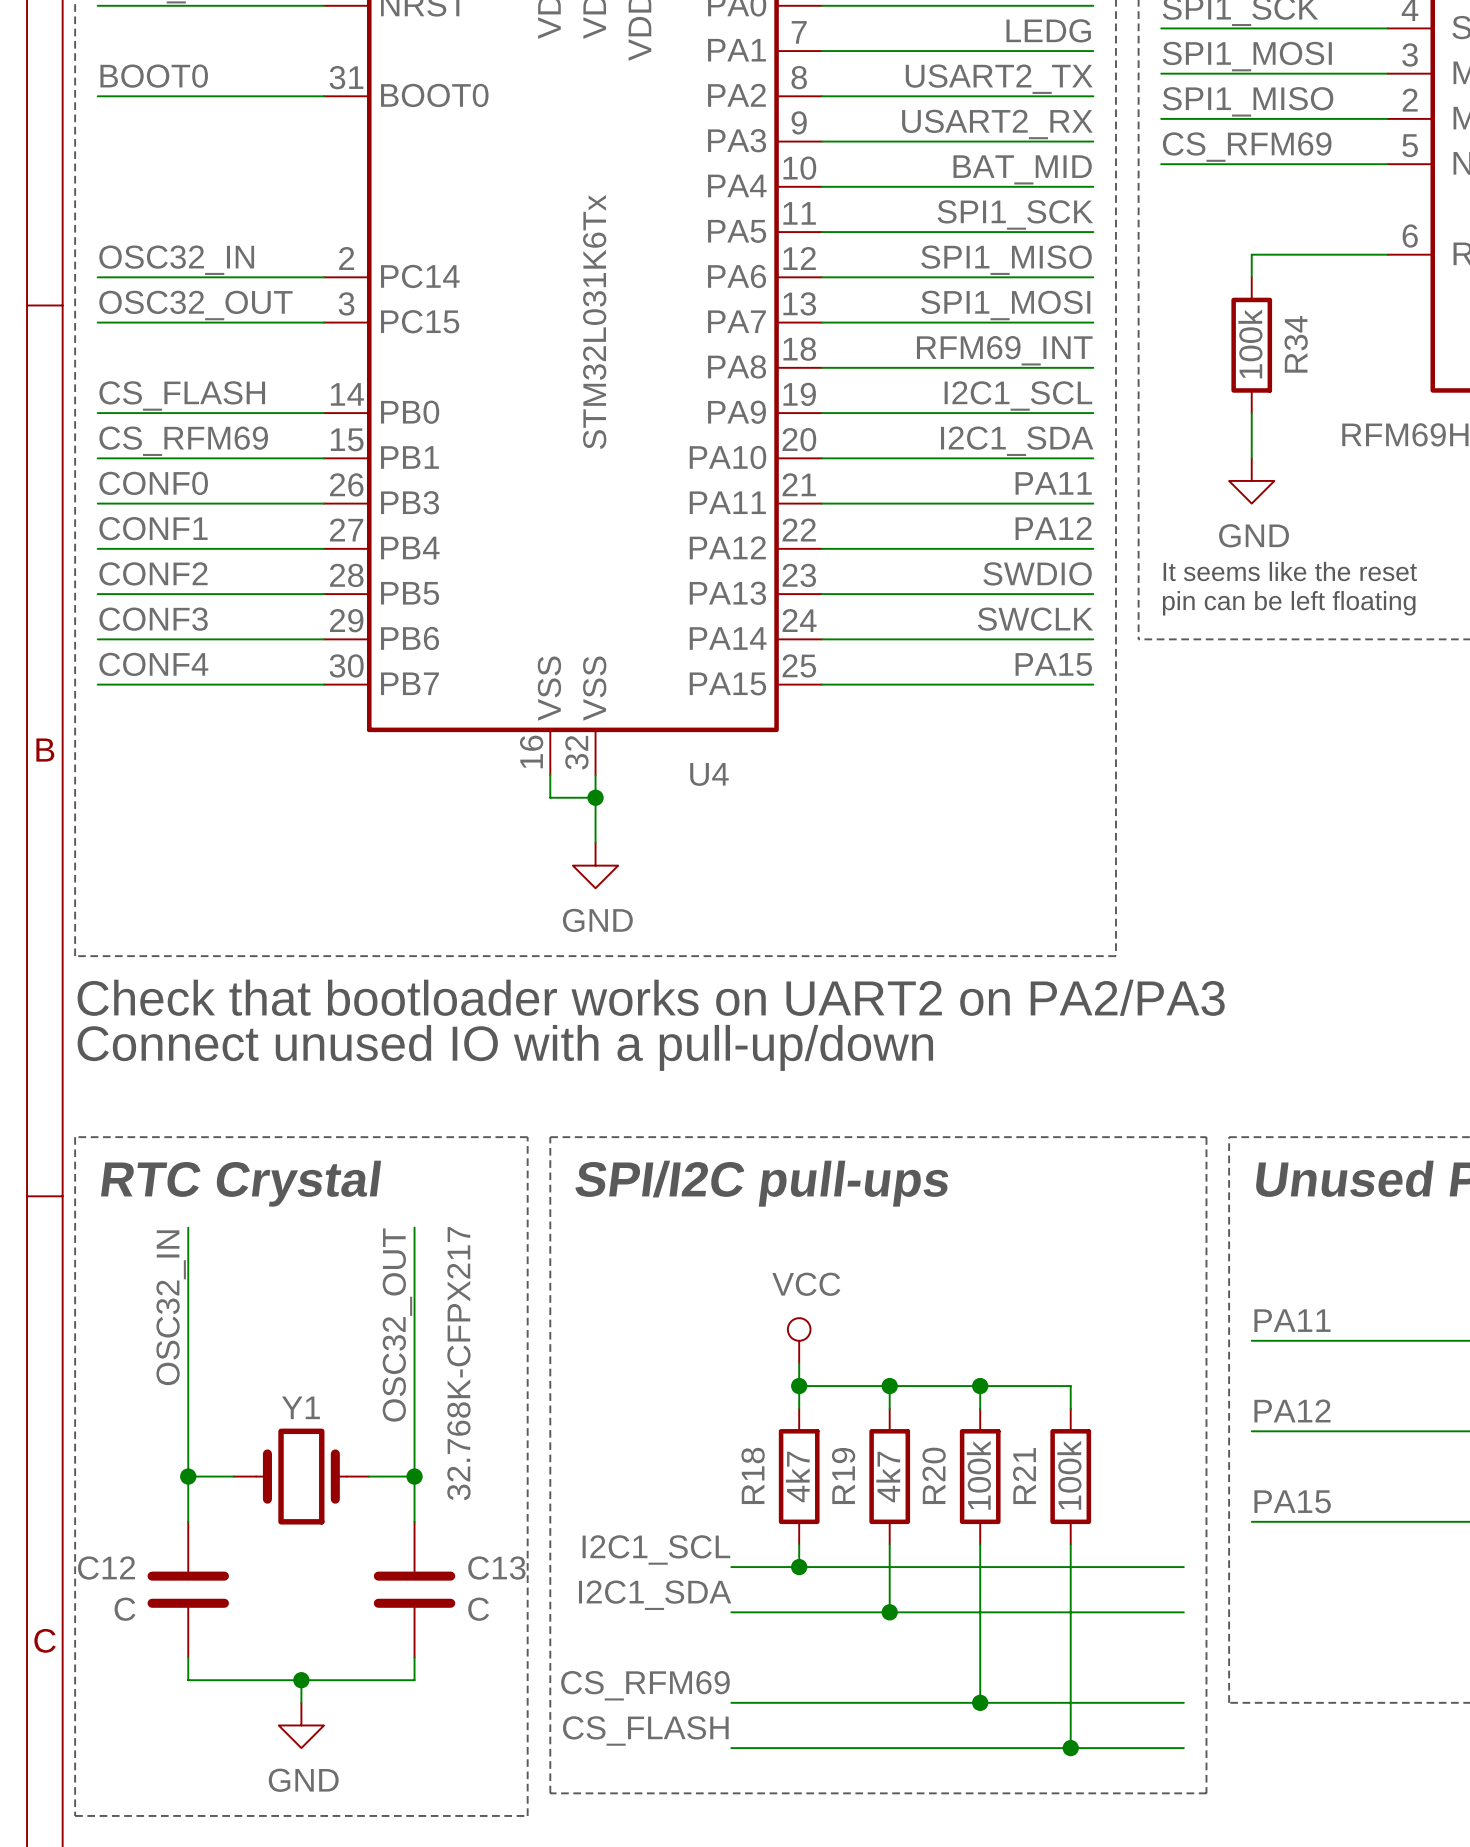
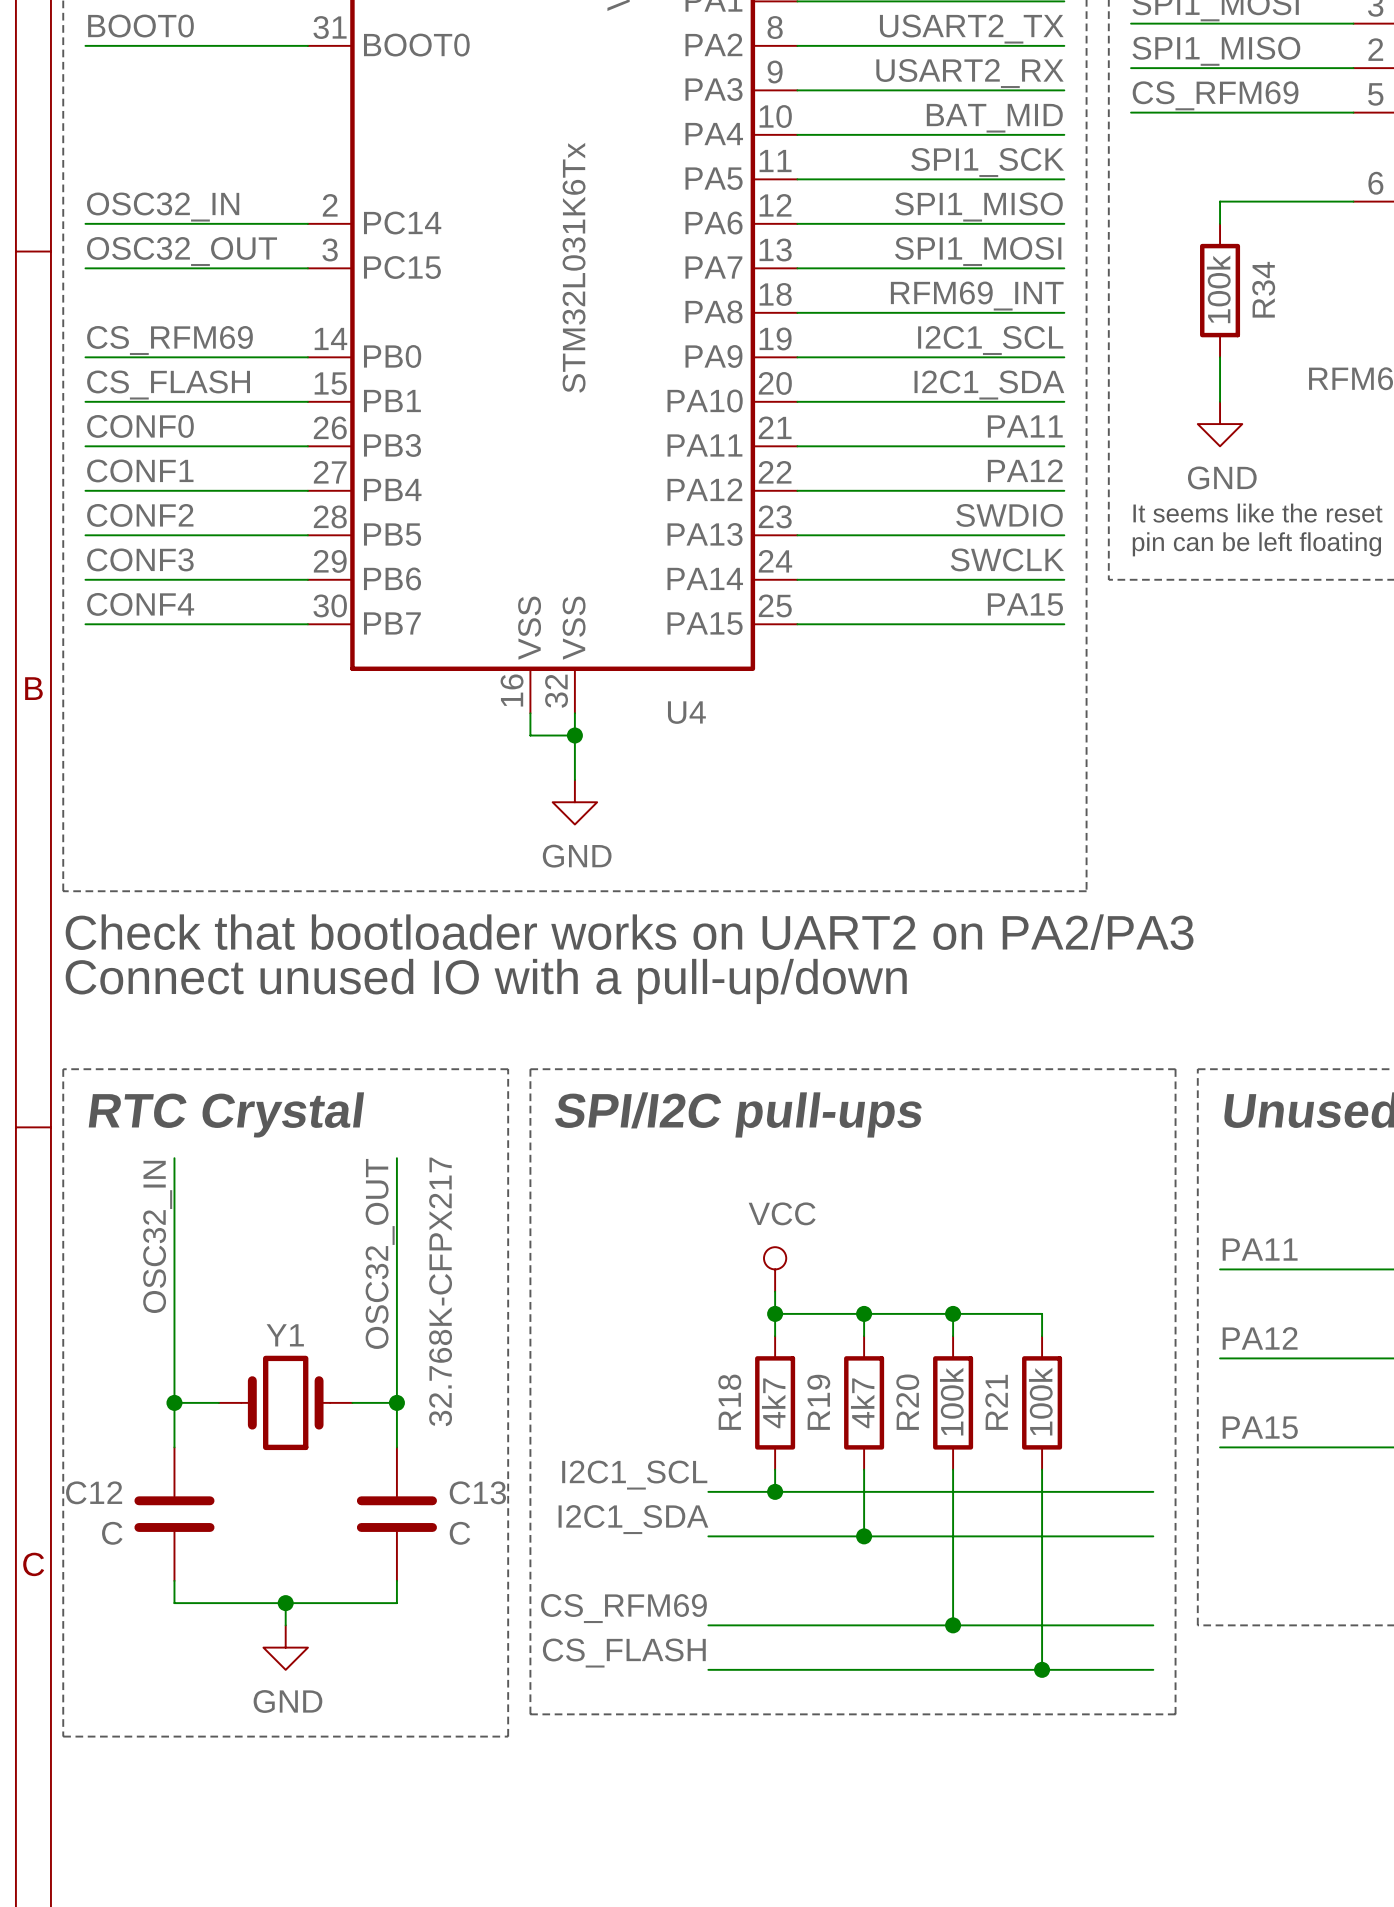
label: CS_FLASH (182, 395) -> CS_RFM69 (169, 340)
label: CS_RFM69 (183, 441) -> CS_FLASH (168, 385)

